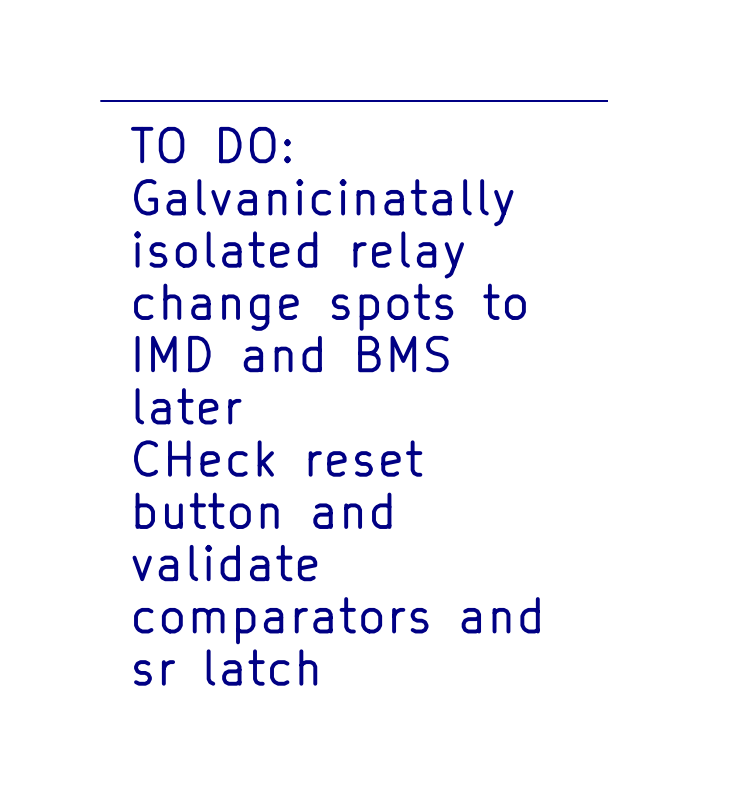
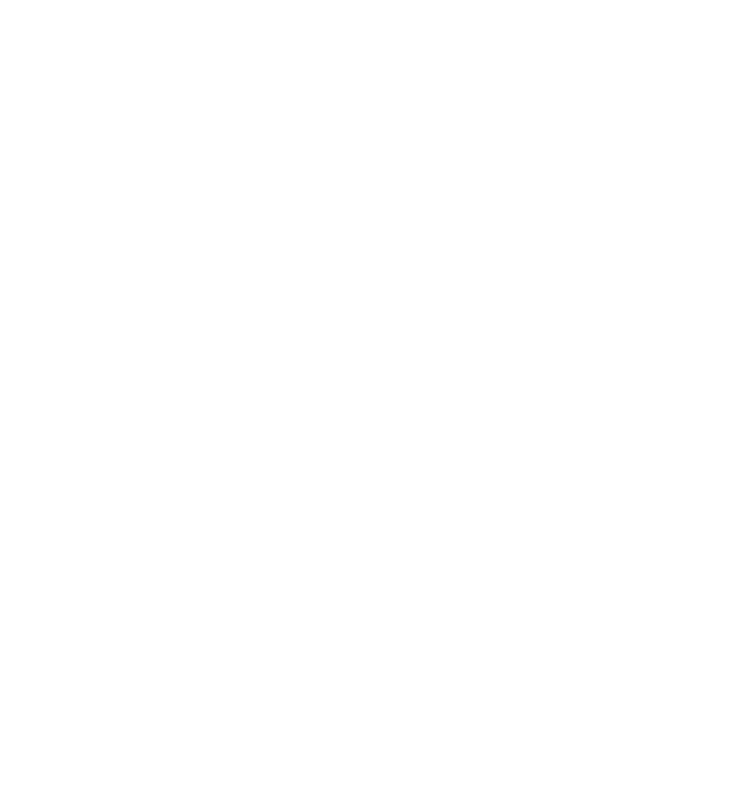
line: (100, 100) (607, 100) -> none
text: TO DO: (210, 145) -> none
text: Galvanicinatally (323, 202) -> none
text: isolated relay (299, 254) -> none
text: change spots to (329, 307) -> none
text: IMD and BMS (292, 354) -> none
text: later (188, 406) -> none
text: CHeck reset (278, 458) -> none
text: button and (263, 510) -> none
text: validate (224, 563) -> none
text: comparators and (336, 620) -> none
text: sr latch (225, 667) -> none

